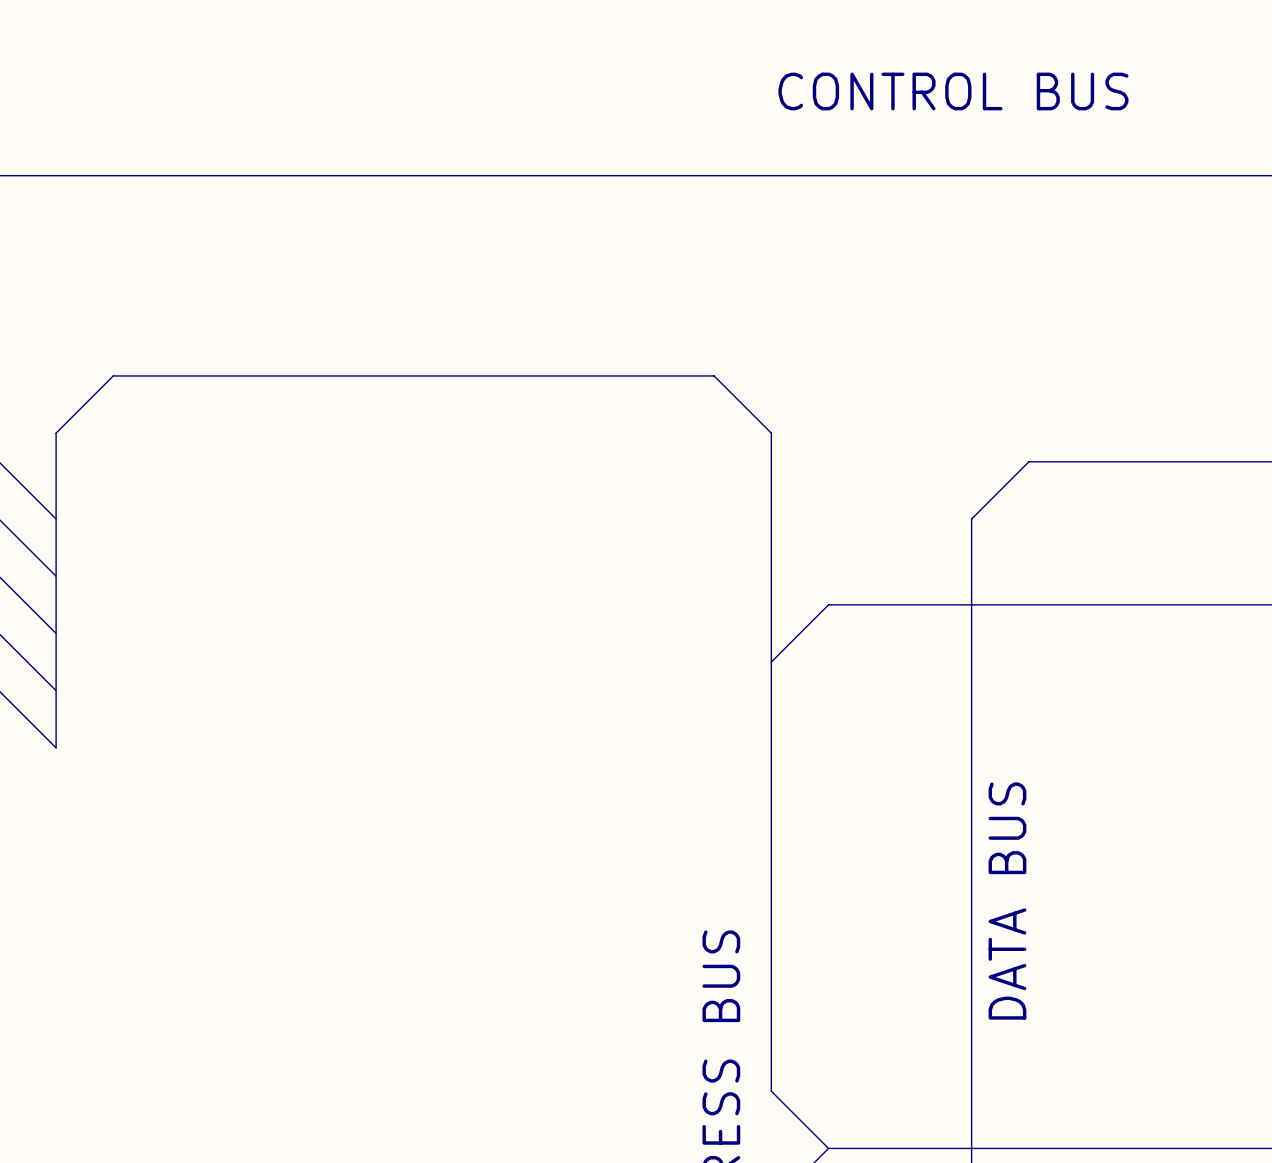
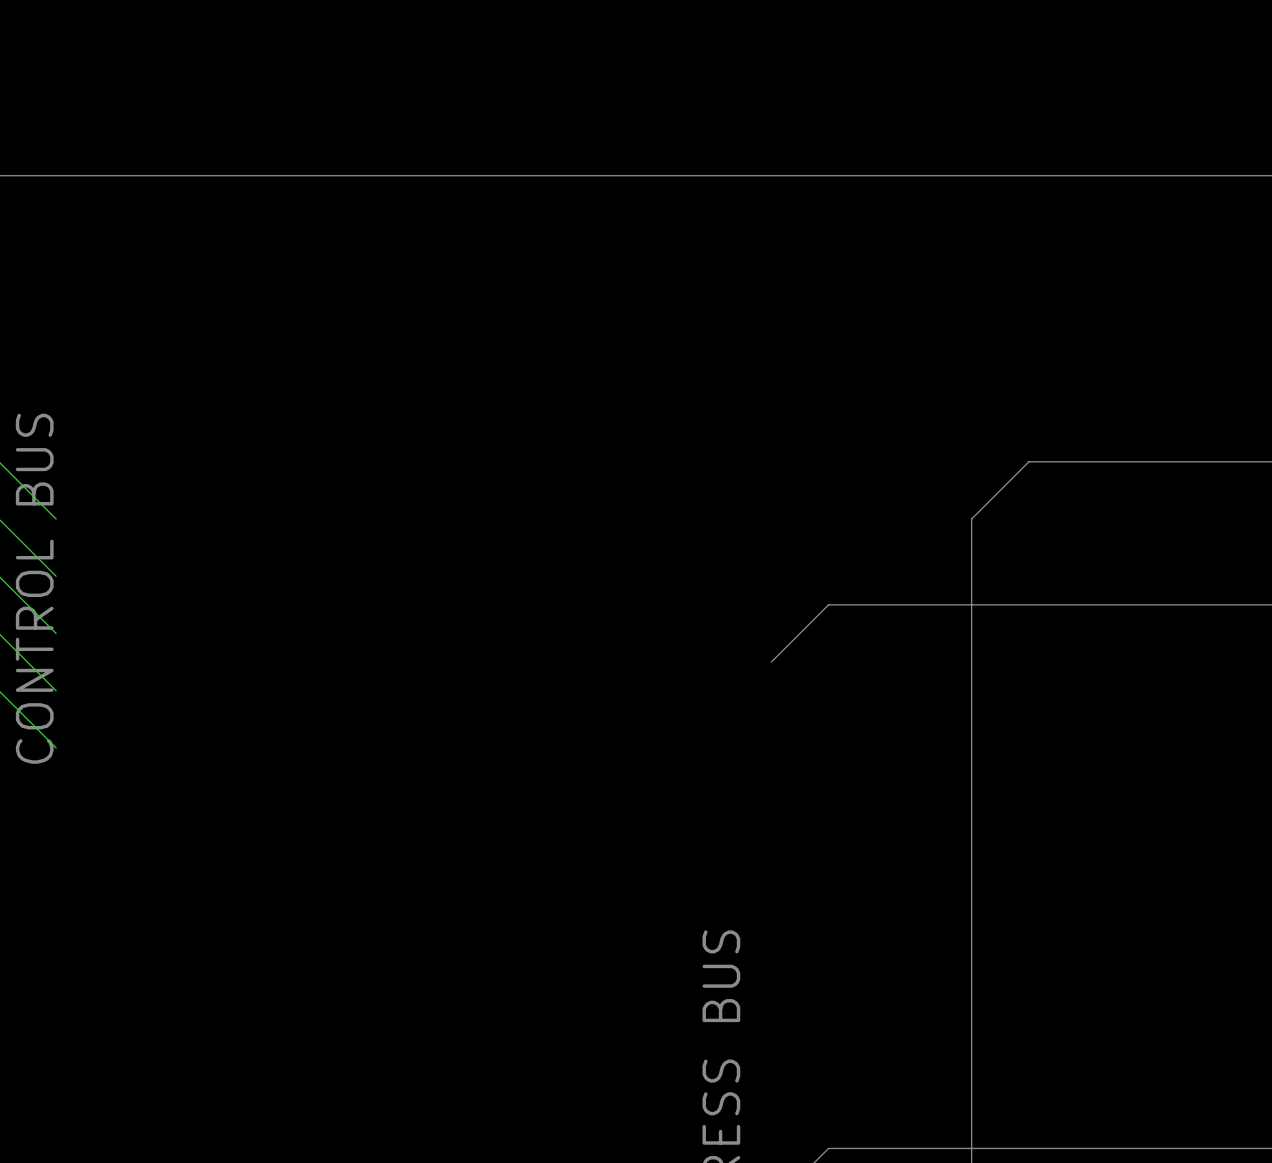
text: CONTROL BUS (953, 91) -> none
text: none -> CONTROL BUS (34, 588)
bus: (56, 747) (56, 433) (113, 375) (714, 375) (771, 433) (771, 1091) (828, 1148) -> none
text: DATA BUS (1007, 901) -> none

